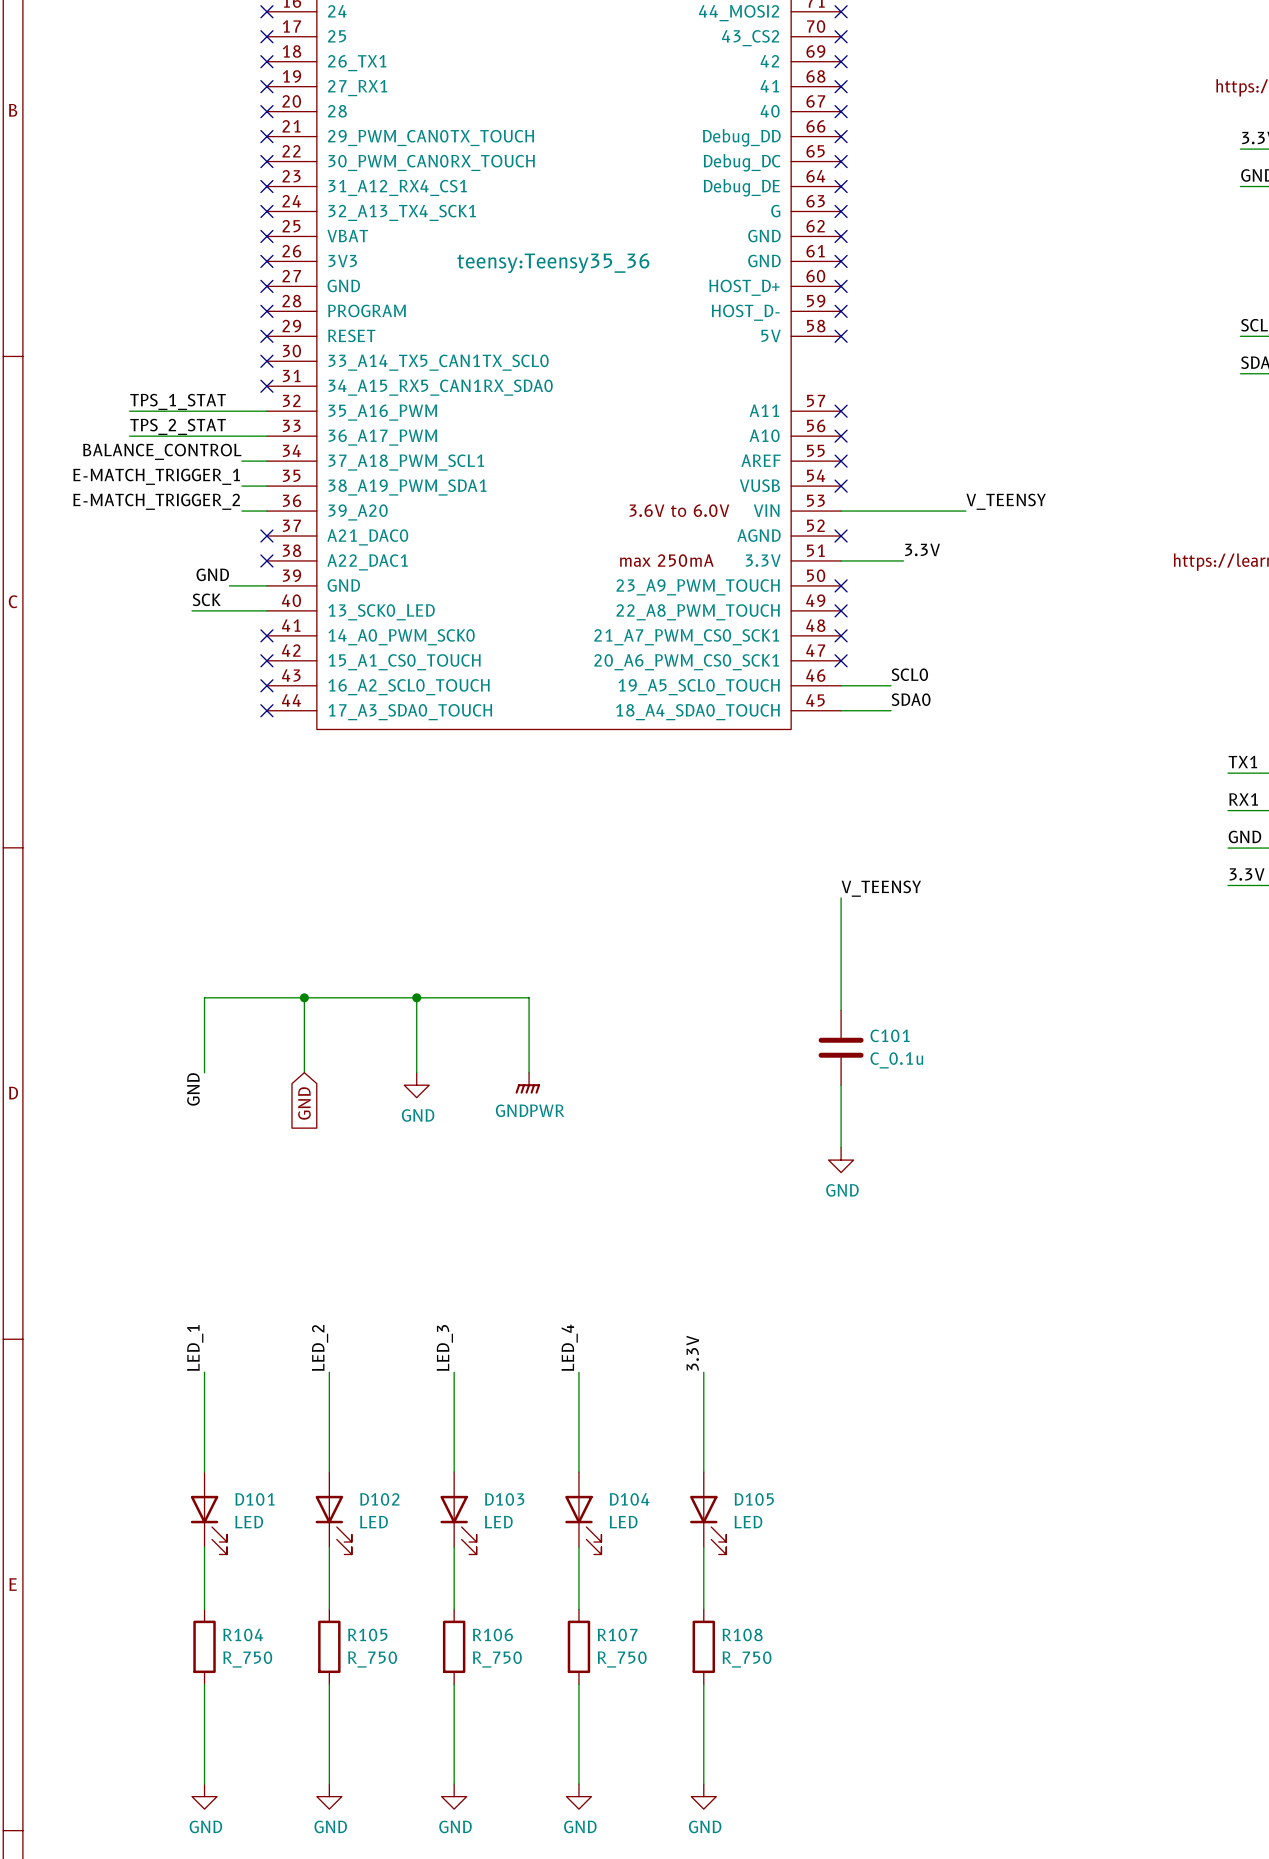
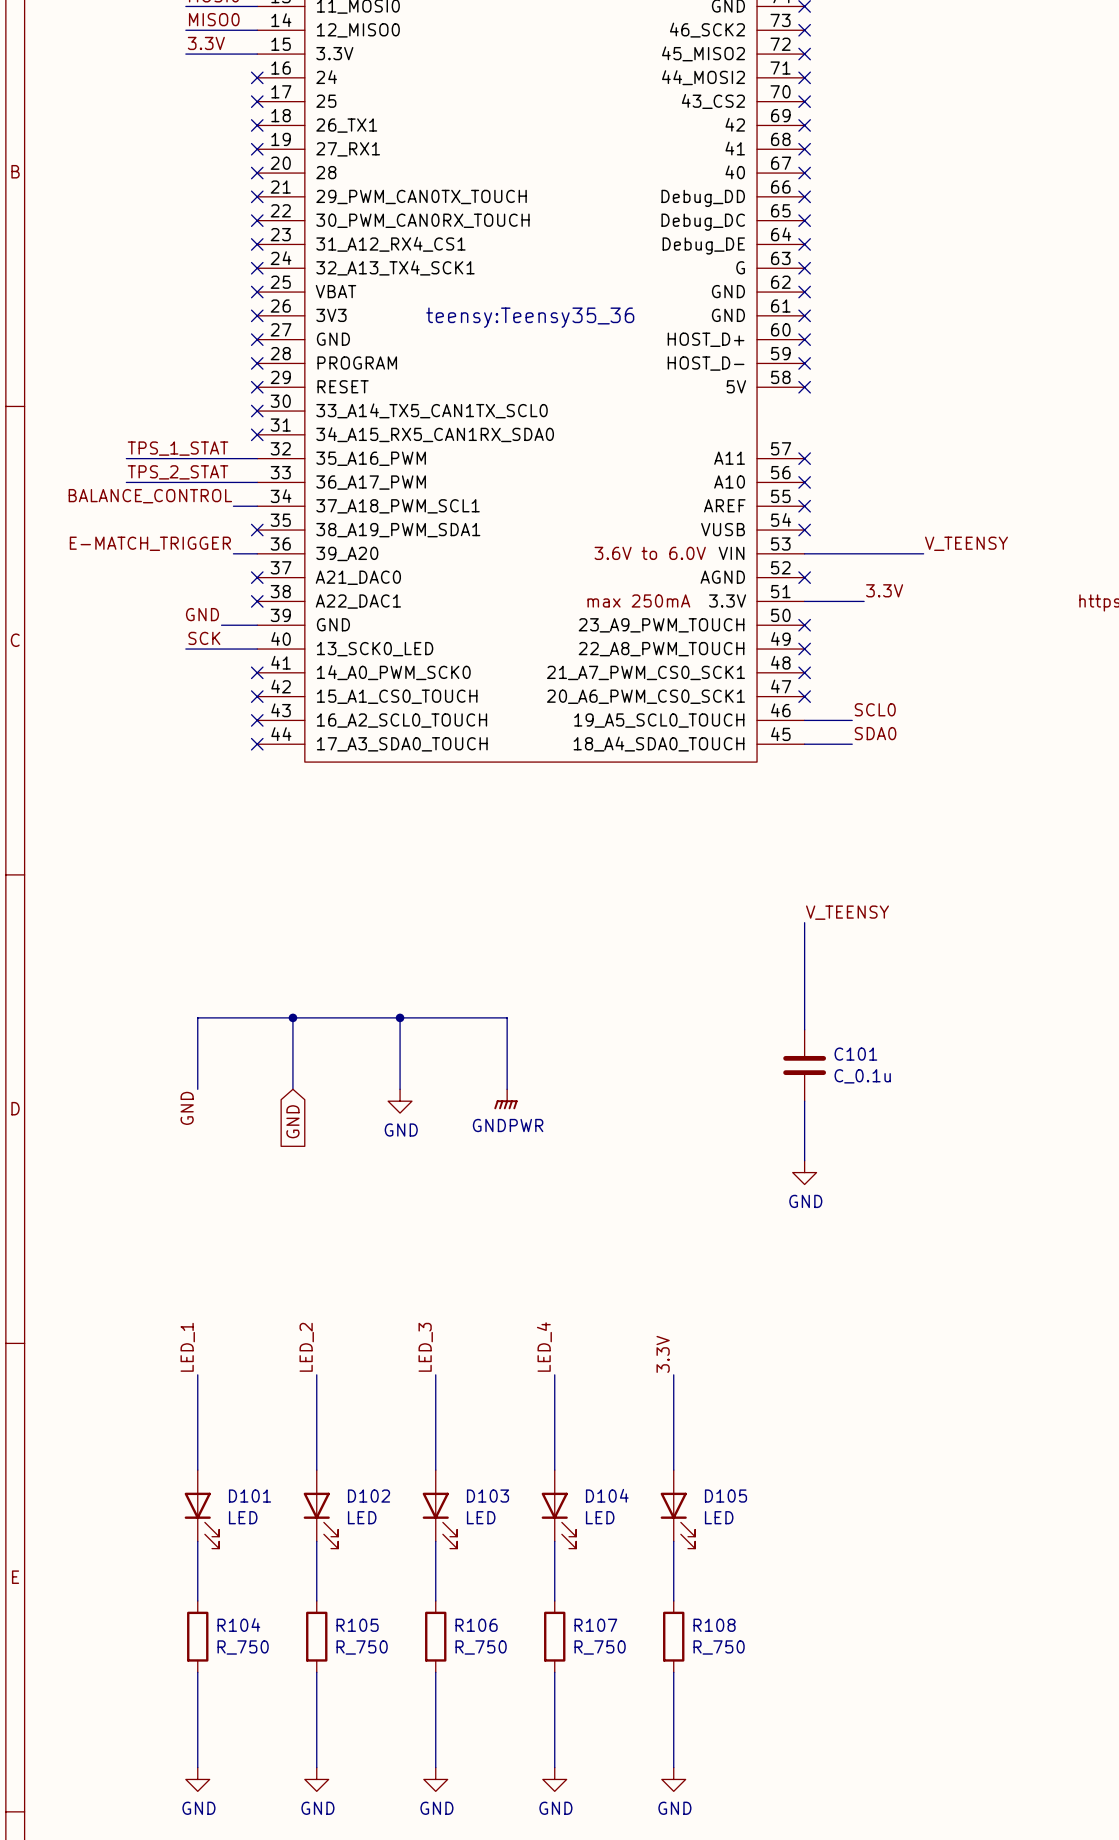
label: E-MATCH_TRIGGER_1 (156, 476) -> none
wire: (241, 486) (266, 486) -> none
no-connect mark: none -> (257, 530)
label: E-MATCH_TRIGGER_2 (156, 501) -> E-MATCH_TRIGGER (150, 543)

